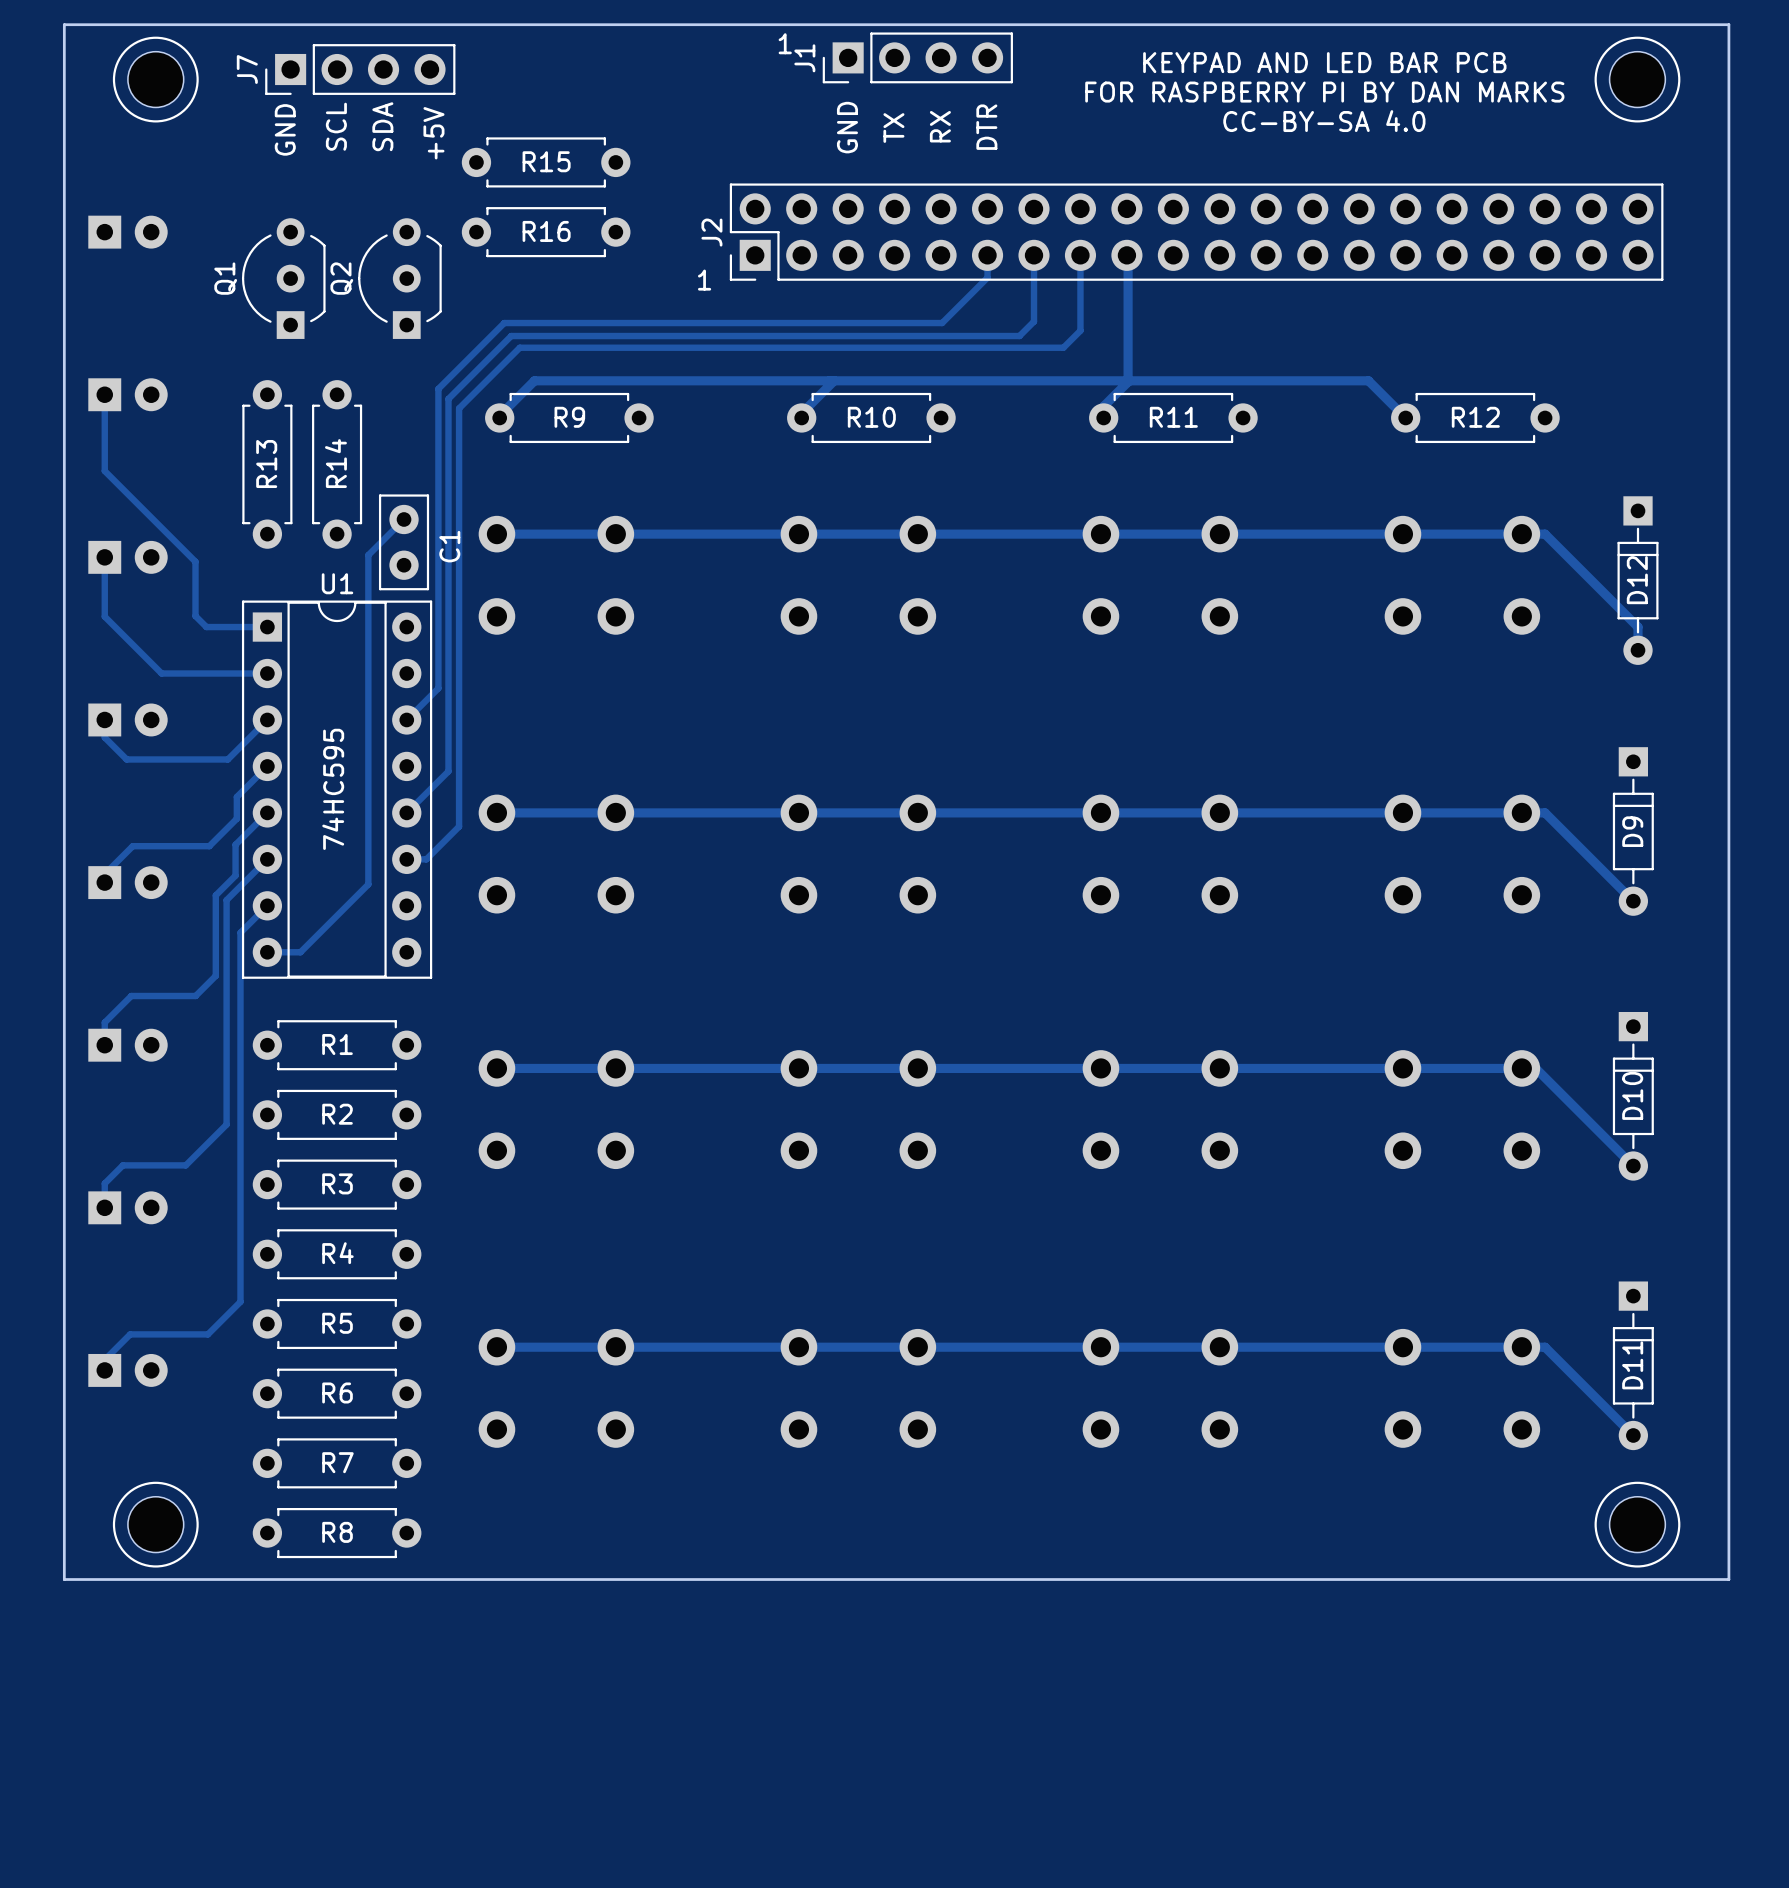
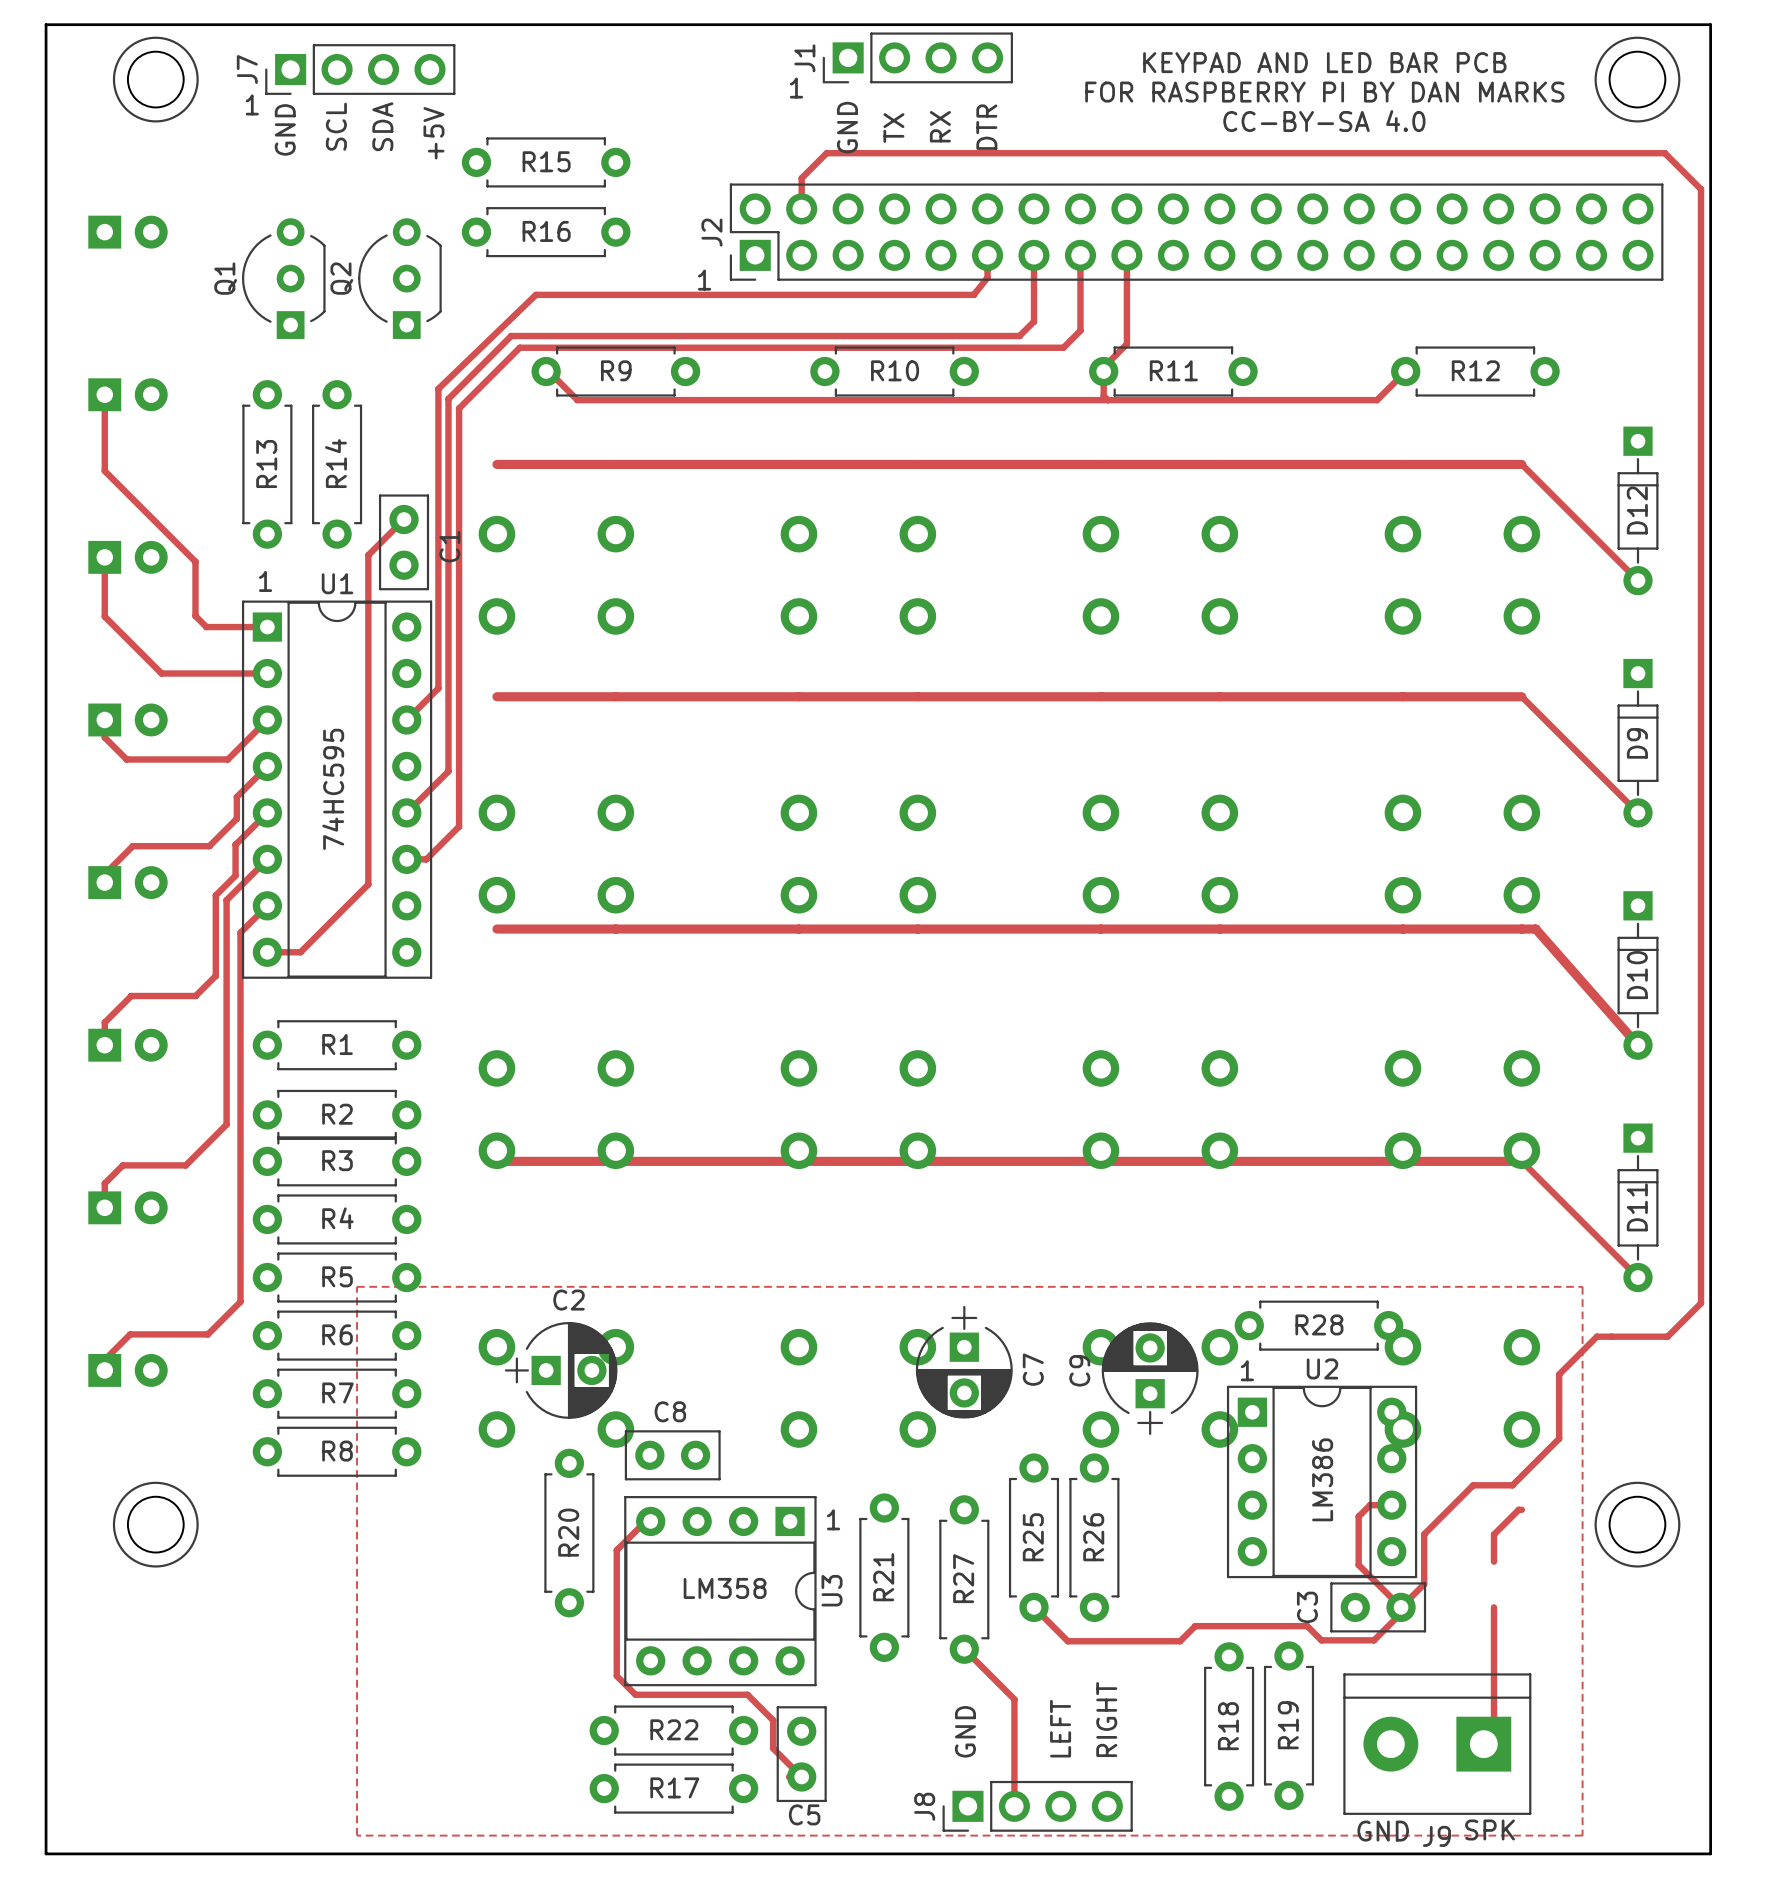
board edge: (64, 24) (64, 1579) (1728, 1579) (1728, 24) (1710, 24) -> (64, 24) (46, 24) (46, 1853) (1710, 1853) (1710, 24)
text position: 1 (785, 43) -> 1 (796, 88)
text: none -> 1 (252, 104)
track: none -> (801, 208) (801, 178) (826, 153) (1664, 153) (1701, 189) (1701, 1303) (1667, 1336) (1596, 1336) (1559, 1374) (1559, 1438) (1512, 1485) (1473, 1485) (1424, 1534) (1424, 1584) (1401, 1607)
track: none -> (1126, 255) (1126, 344) (1103, 367) (1103, 395) (1107, 400)
track: (1128, 256) (1128, 381) -> none
track: (987, 277) (942, 323) (504, 323) (438, 388) -> (987, 277) (973, 294) (535, 294) (438, 388)
track: none -> (546, 369) (546, 371) (548, 371) (577, 400) (1377, 400) (1405, 371)
track: (834, 380) (801, 413) (801, 417) -> none
track: (1129, 380) (1103, 406) (1103, 417) -> none
track: (499, 417) (499, 415) (534, 380) (1368, 380) (1405, 417) -> none
R9 position: (569, 417) -> (615, 371)
R10 position: (871, 417) -> (894, 371)
R11 position: (1173, 417) -> (1173, 371)
R12 position: (1475, 417) -> (1475, 371)
track: none -> (496, 464) (1521, 464) (1638, 580)
track: (496, 534) (1545, 534) (1638, 627) (1638, 650) -> none
D12 position: (1638, 580) -> (1638, 510)
text: none -> 1 (265, 581)
track: none -> (496, 696) (1521, 696) (1638, 812)
track: (496, 812) (1545, 812) (1633, 901) -> none
D9 position: (1633, 831) -> (1638, 743)
track: none -> (496, 929) (1535, 929) (1638, 1045)
track: (496, 1068) (1535, 1068) (1633, 1166) -> none
D10 position: (1633, 1096) -> (1638, 975)
track: none -> (496, 1161) (1521, 1161) (1638, 1277)
R3 position: (337, 1184) -> (337, 1161)
R4 position: (337, 1254) -> (337, 1219)
zone outline: none -> (357, 1286) (357, 1835) (1582, 1835) (1582, 1286) (357, 1286)
R5 position: (337, 1323) -> (337, 1277)
R28: none -> (1318, 1325)
R6: none -> (337, 1335)
track: (496, 1347) (1545, 1347) (1633, 1435) -> none
C7: none -> (964, 1362)
D11 position: (1633, 1365) -> (1638, 1207)
C2: none -> (561, 1370)
text: none -> 1 (1247, 1370)
C9: none -> (1150, 1378)
R6 name: R6 (337, 1392) -> R7 (337, 1392)
C8: none -> (672, 1455)
R7: (337, 1463) -> none
text: none -> LM386 (1322, 1479)
U2: none -> (1322, 1481)
track: none -> (1391, 1505) (1370, 1505) (1358, 1516) (1358, 1565) (1401, 1607)
track: none -> (1521, 1509) (1518, 1509) (1493, 1534) (1493, 1561)
text: none -> 1 (833, 1519)
track: none -> (650, 1521) (645, 1521) (616, 1550) (616, 1676) (635, 1694) (747, 1694) (773, 1720) (773, 1748) (801, 1776) (789, 1776)
R8 position: (337, 1533) -> (337, 1451)
R20: none -> (569, 1533)
R25: none -> (1034, 1537)
R26: none -> (1094, 1537)
R21: none -> (884, 1577)
R27: none -> (964, 1579)
text: none -> LM358 (725, 1588)
U3: none -> (720, 1591)
track: none -> (1034, 1607) (1067, 1641) (1180, 1641) (1195, 1626) (1307, 1626) (1321, 1640) (1374, 1640) (1401, 1613) (1401, 1607)
C3: none -> (1378, 1607)
track: none -> (1493, 1607) (1493, 1733)
track: none -> (964, 1649) (1014, 1699) (1014, 1806)
text: none -> RIGHT (1106, 1719)
R19: none -> (1288, 1725)
R18: none -> (1229, 1726)
text: none -> LEFT (1060, 1728)
R22: none -> (673, 1730)
text: none -> GND (965, 1731)
J9: none -> (1437, 1744)
C5: none -> (801, 1754)
R17: none -> (673, 1788)
J8: none -> (1037, 1806)
text: none -> SPK (1490, 1829)
text: none -> GND (1383, 1831)

